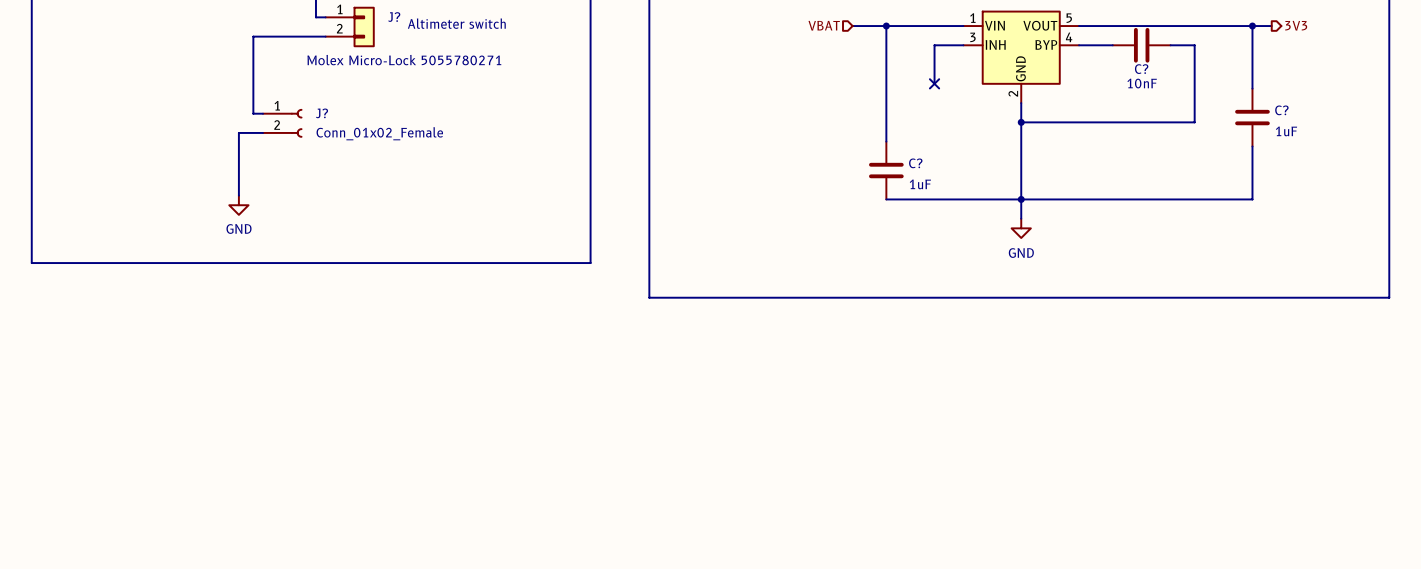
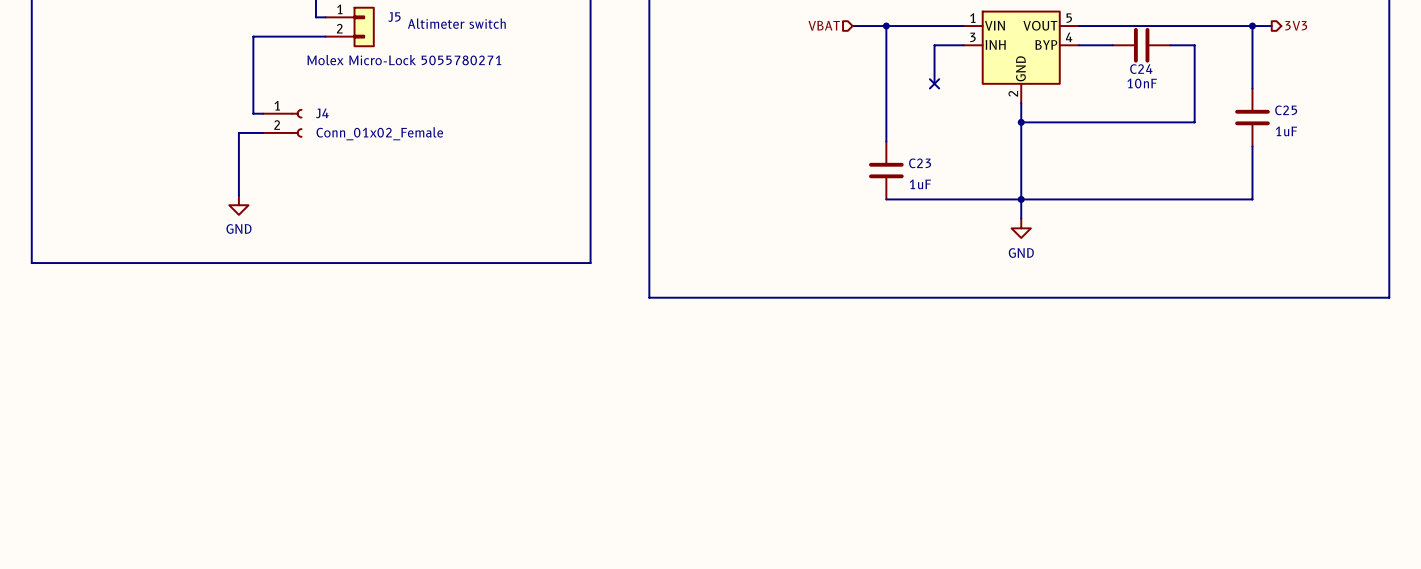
J? name: J? (394, 17) -> J5 (394, 17)
C? name: C? (1141, 69) -> C24 (1141, 69)
C? name: C? (1281, 110) -> C25 (1286, 110)
J? name: J? (322, 113) -> J4 (322, 113)
C? name: C? (915, 163) -> C23 (920, 163)

